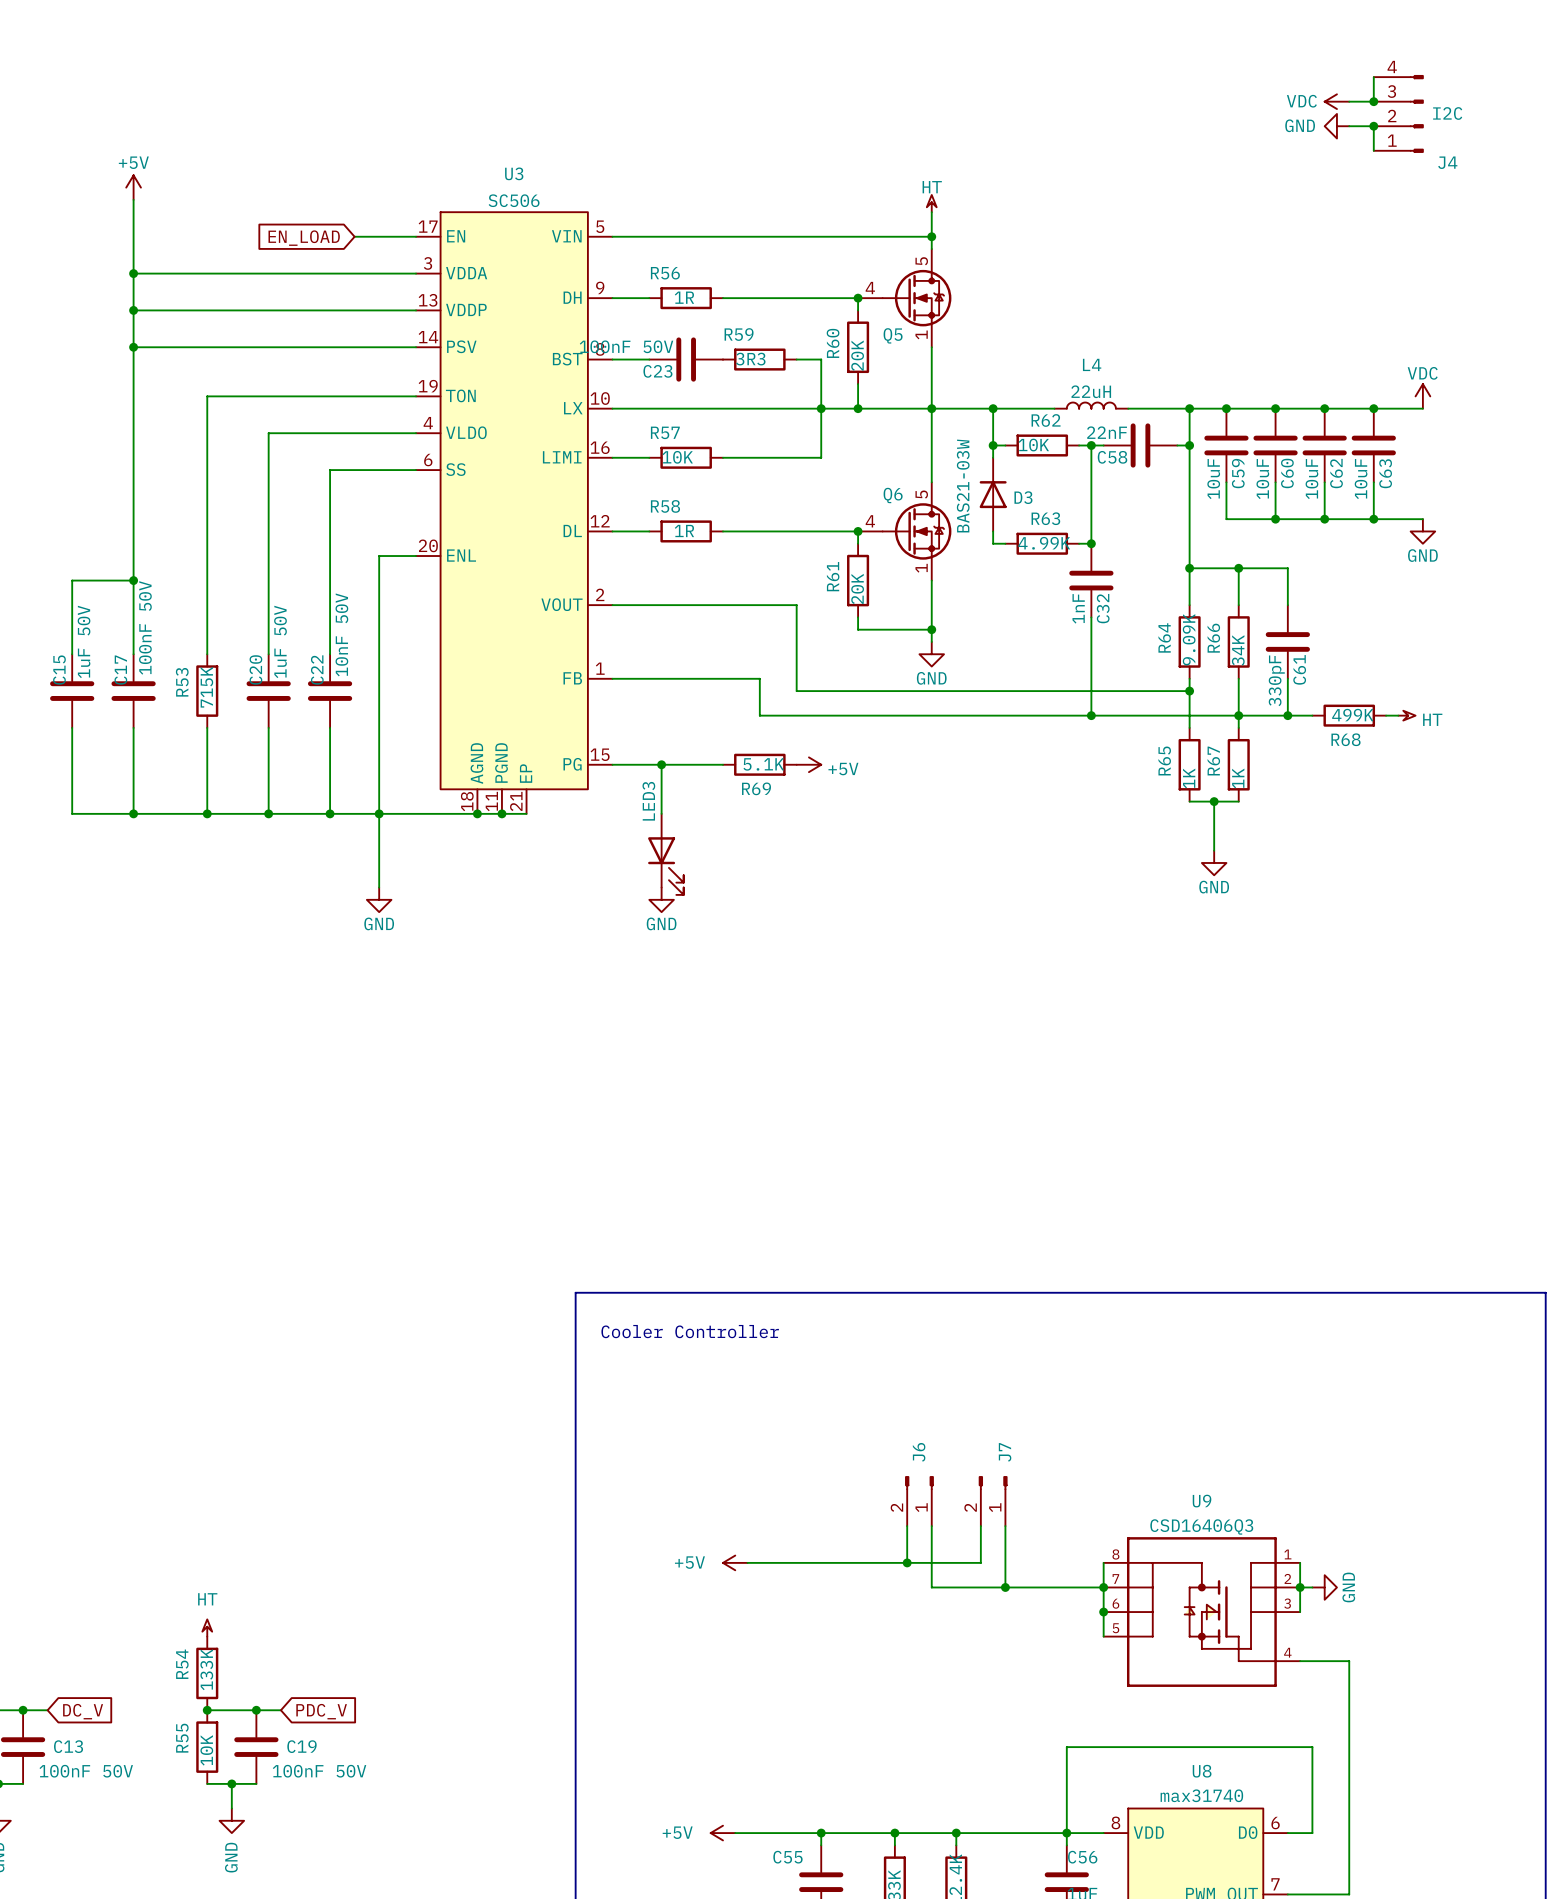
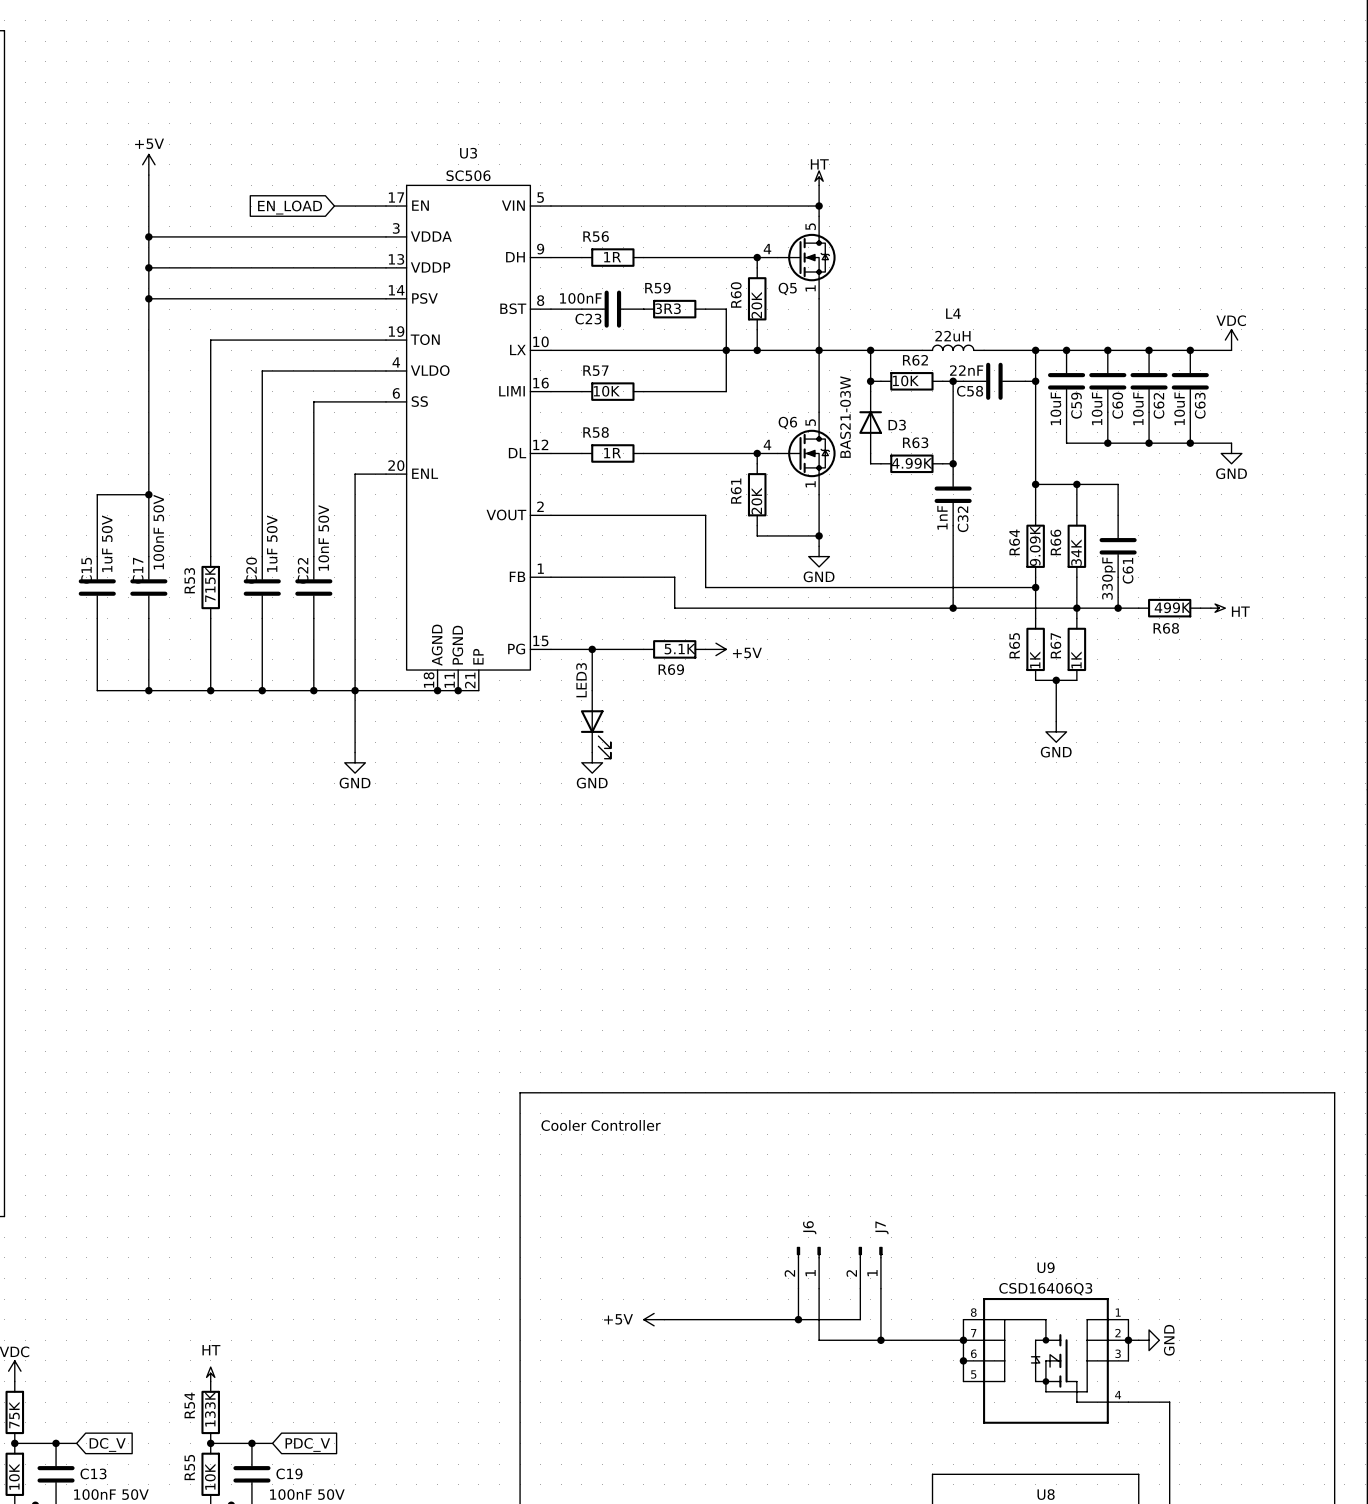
wire: (1373, 77) (1373, 101) (1349, 101) -> none
power symbol: VDC (1336, 101) -> none
junction: (1373, 101) -> none
J4: I2C (1398, 113) -> none
power symbol: GND (1336, 126) -> none
wire: (1349, 126) (1373, 126) (1373, 150) -> none
junction: (1373, 126) -> none
C23 value: 100nF 50V (626, 346) -> 100nF (580, 298)

